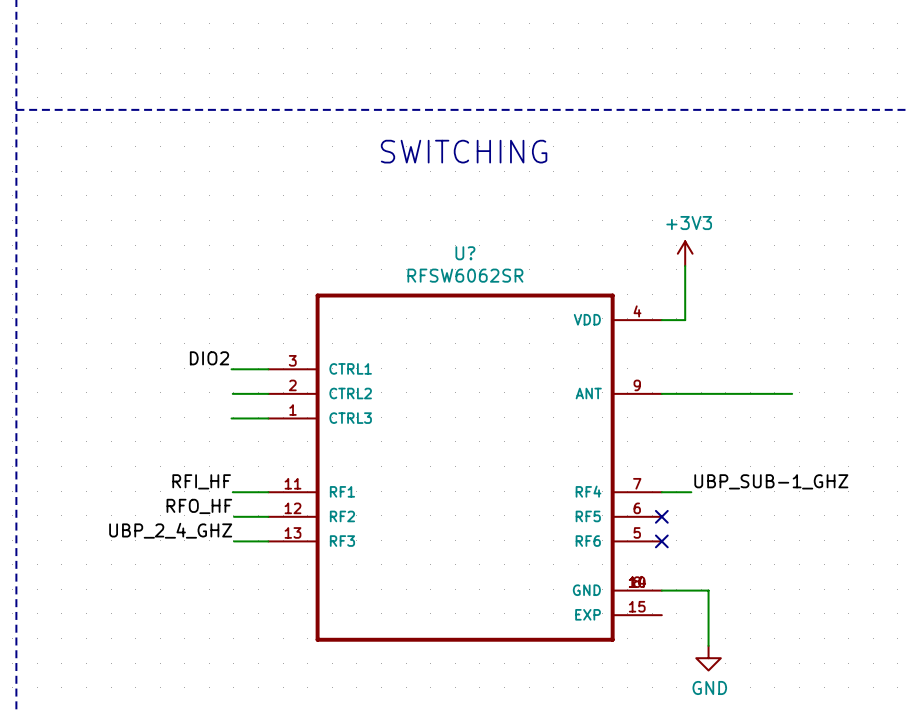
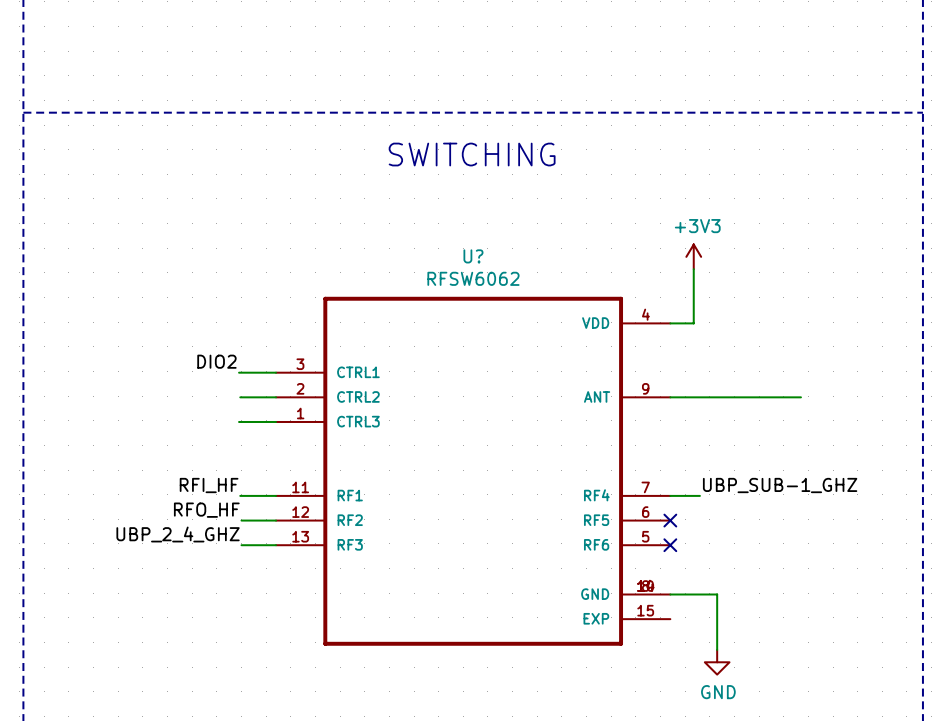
U? value: RFSW6062SR (465, 275) -> RFSW6062 (473, 278)

